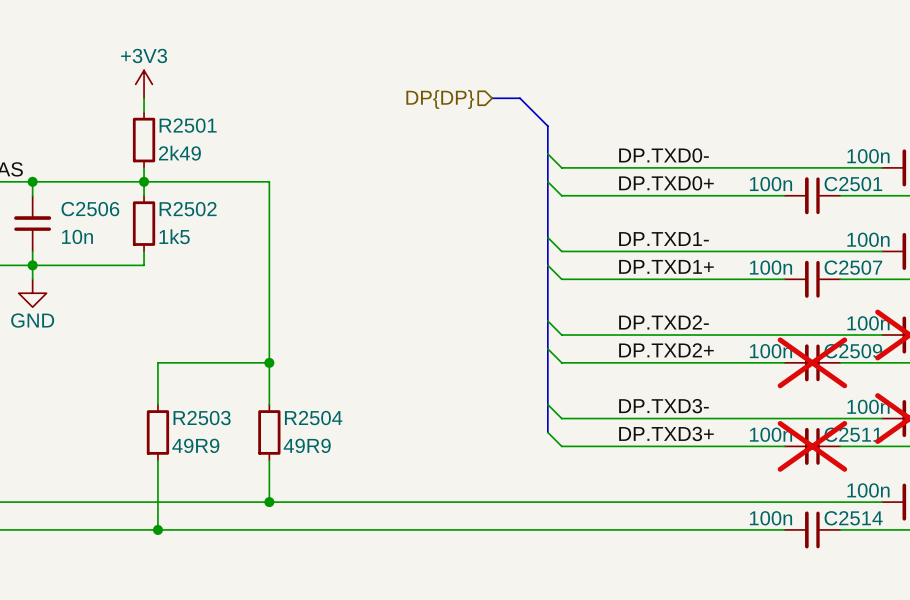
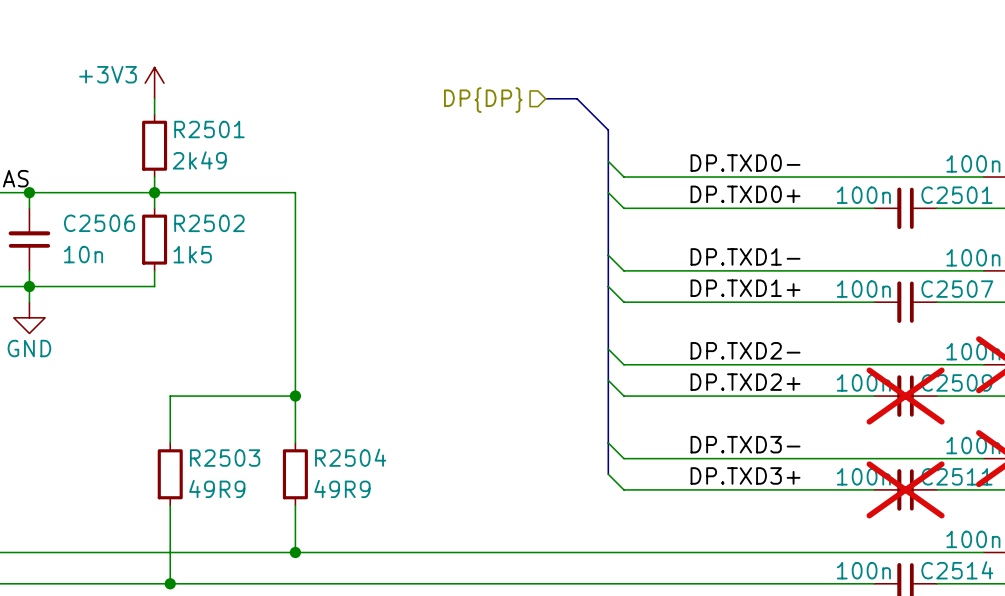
power symbol text position: +3V3 (144, 55) -> +3V3 (108, 74)

